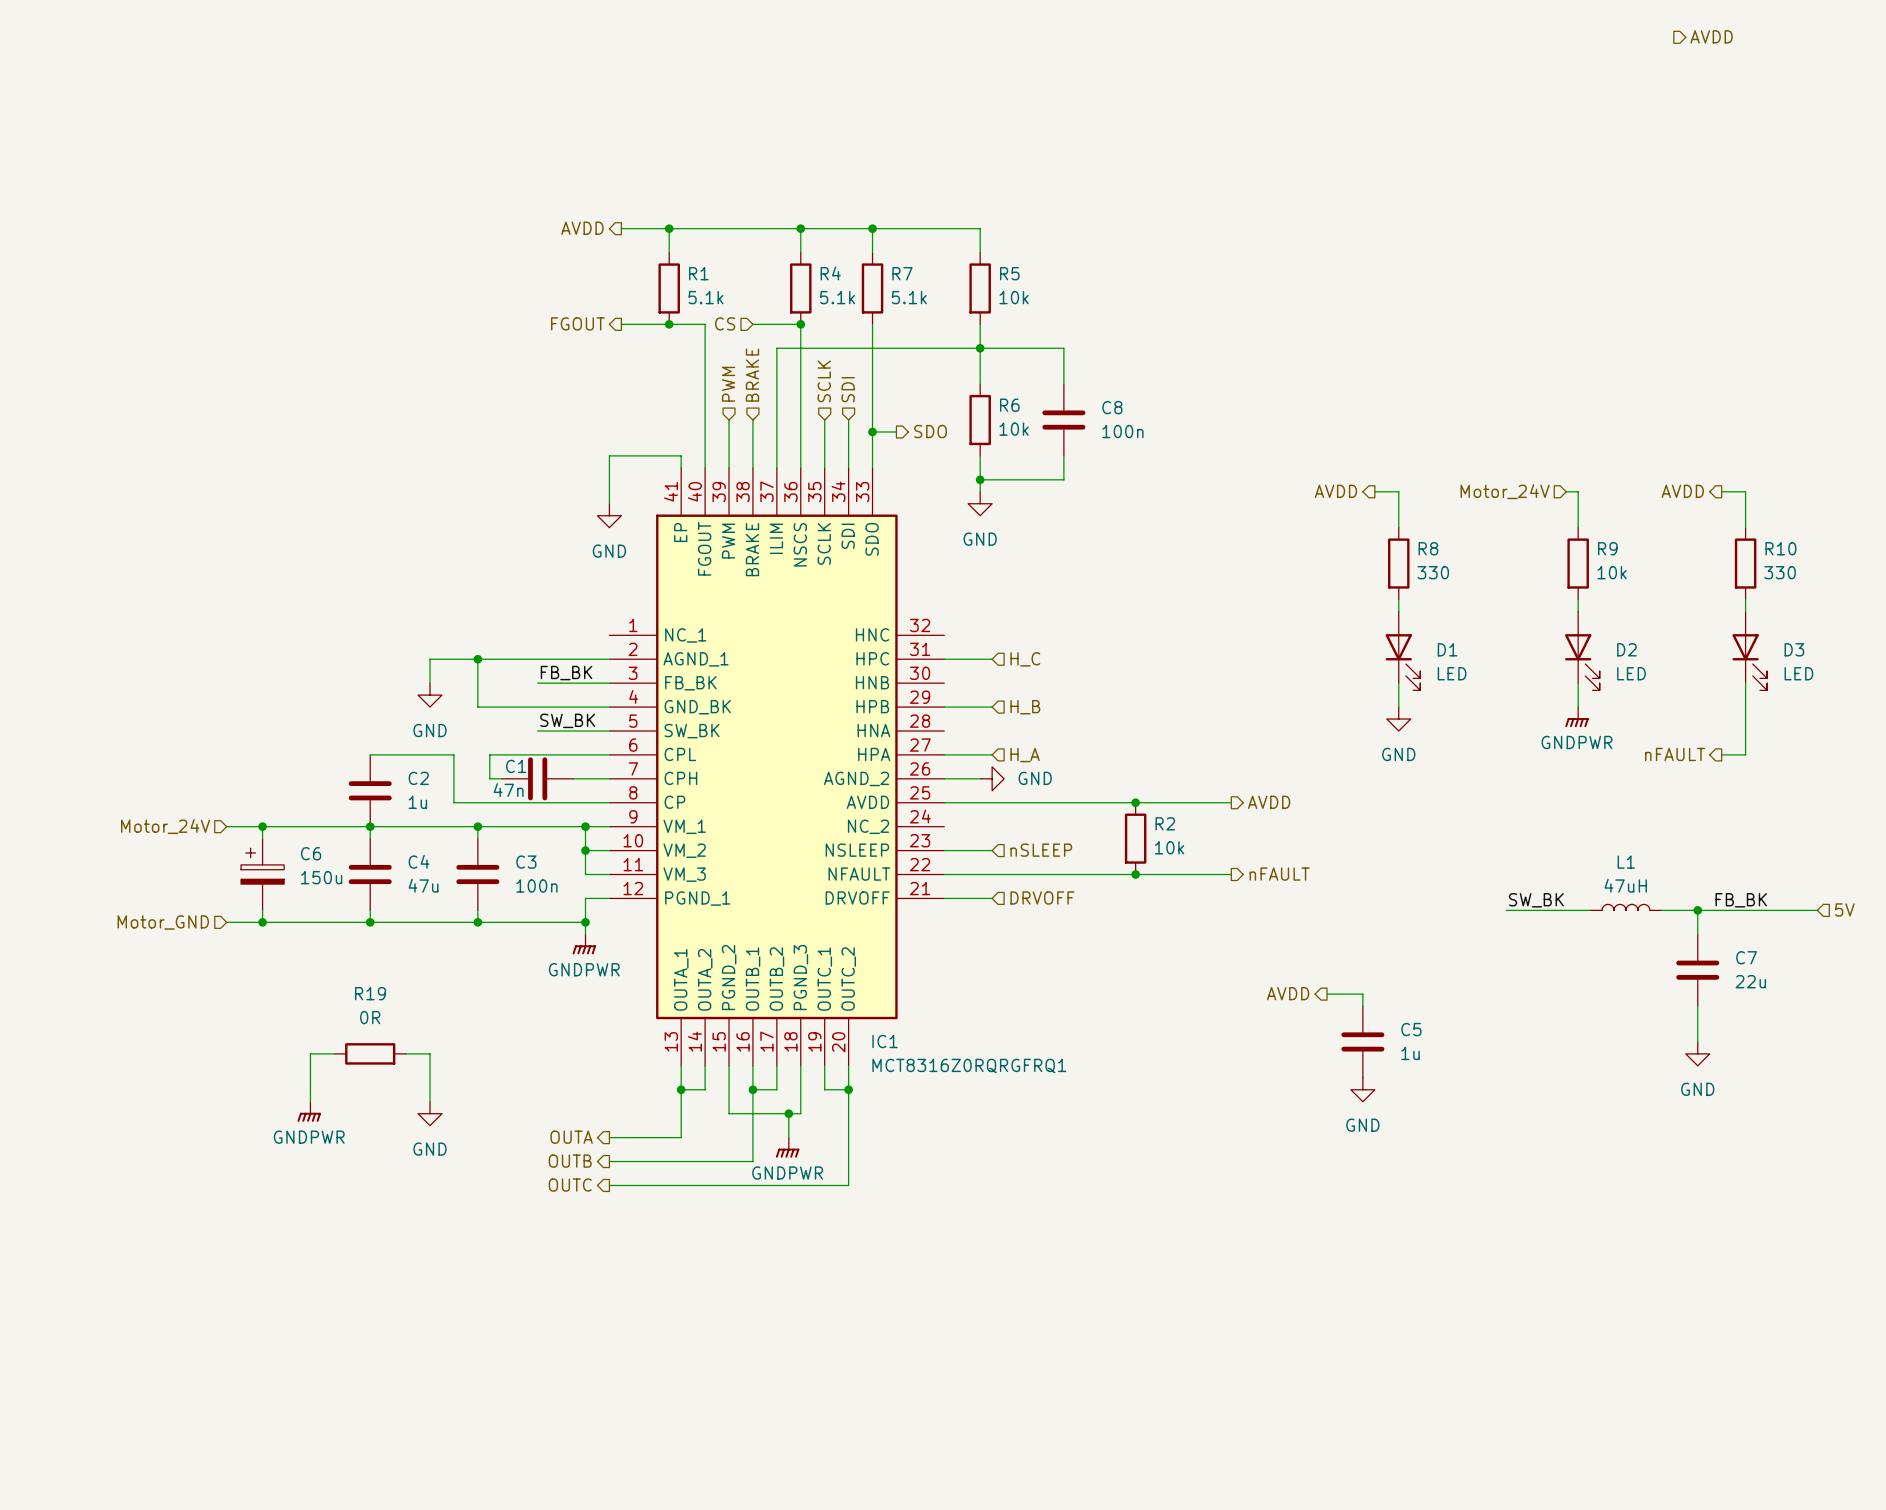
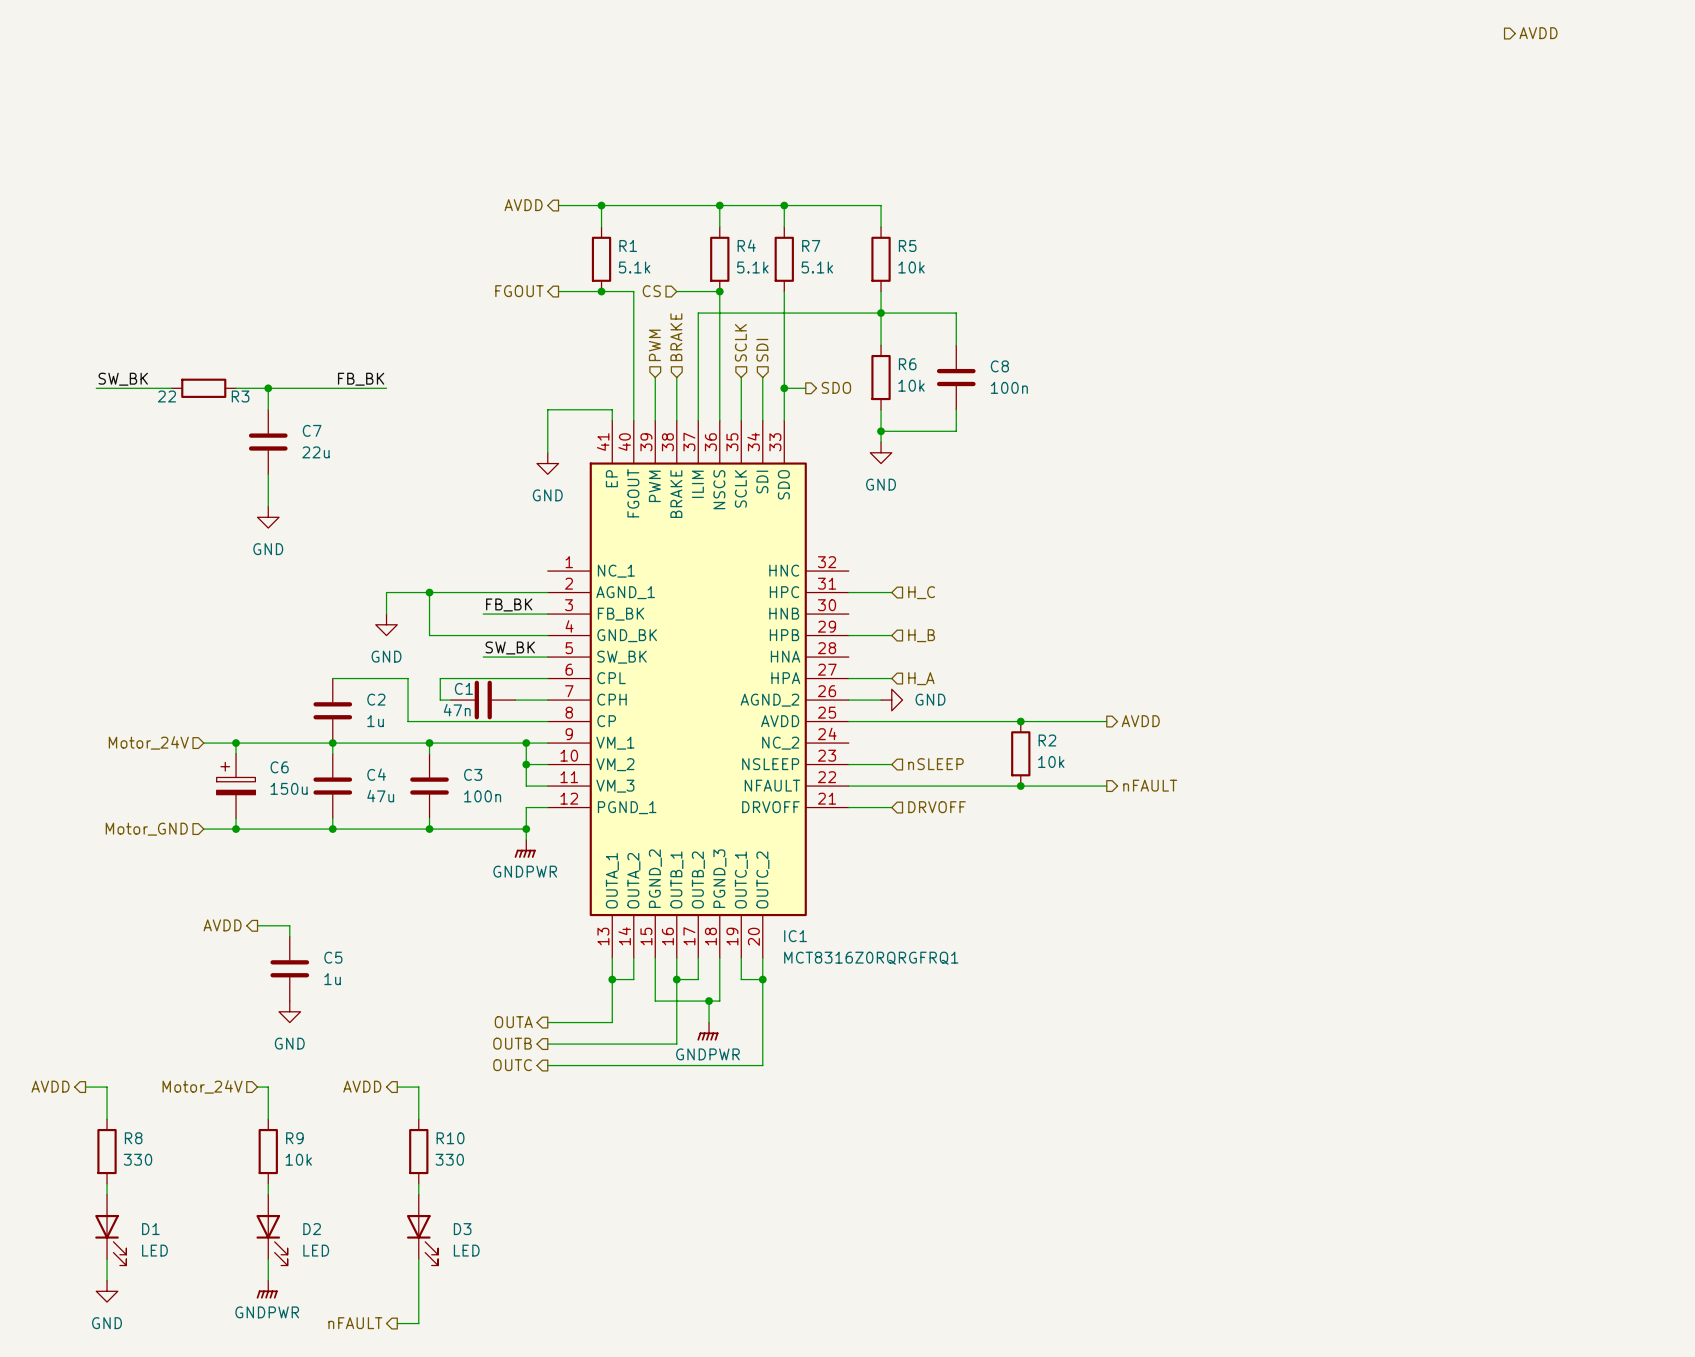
label: none -> SW_BK (123, 379)
label: none -> FB_BK (361, 379)
wire: none -> (96, 388) (171, 388)
R3: none -> 22 (203, 388)
wire: none -> (236, 388) (386, 388)
wire: none -> (268, 388) (268, 409)
junction: none -> (268, 388)
hierarchical label: AVDD (1335, 491) -> none
wire: (1374, 491) (1398, 491) (1398, 527) -> none
hierarchical label: Motor_24V (1505, 491) -> none
wire: (1566, 491) (1578, 491) (1578, 527) -> none
hierarchical label: AVDD (1682, 491) -> none
wire: (1721, 491) (1745, 491) (1745, 527) -> none
wire: none -> (268, 474) (268, 506)
R8 position: (1398, 563) -> (107, 1151)
R9 position: (1578, 563) -> (268, 1151)
R10 position: (1745, 563) -> (418, 1151)
power symbol: none -> GND (268, 517)
wire: (1398, 599) (1398, 611) -> none
wire: (1578, 599) (1578, 611) -> none
wire: (1745, 599) (1745, 611) -> none
D1 position: (1402, 650) -> (110, 1230)
D2 position: (1582, 650) -> (272, 1230)
D3 position: (1749, 650) -> (422, 1230)
wire: (1398, 683) (1398, 707) -> none
wire: (1578, 683) (1578, 707) -> none
wire: (1745, 683) (1745, 754) (1721, 754) -> none
power symbol: GNDPWR (1576, 717) -> none
power symbol: GND (1398, 719) -> none
hierarchical label: nFAULT (1675, 754) -> none
label: SW_BK (1536, 900) -> none
label: FB_BK (1741, 900) -> none
L1: 47uH (1626, 907) -> none
hierarchical label: 5V (1844, 909) -> none
wire: (1506, 910) (1590, 910) -> none
wire: (1661, 910) (1817, 910) -> none
wire: (1697, 910) (1697, 934) -> none
junction: (1697, 910) -> none
C7 position: (1697, 970) -> (268, 442)
hierarchical label: AVDD (1288, 993) -> none
wire: (1327, 994) (1362, 994) (1362, 1006) -> none
wire: (1697, 1006) (1697, 1041) -> none
hierarchical label: none -> AVDD (222, 925)
wire: none -> (257, 925) (289, 925) (289, 936)
C5 position: (1362, 1041) -> (289, 968)
wire: (334, 1053) (310, 1053) (310, 1101) -> none
R19: 0R (370, 1053) -> none
wire: (406, 1053) (430, 1053) (430, 1101) -> none
power symbol: GND (1697, 1053) -> none
power symbol: GND (1362, 1089) -> none
power symbol: GNDPWR (309, 1111) -> none
power symbol position: GND (430, 1113) -> GND (289, 1011)
hierarchical label: none -> AVDD (50, 1086)
hierarchical label: none -> AVDD (362, 1086)
wire: none -> (85, 1087) (107, 1087) (107, 1119)
hierarchical label: none -> Motor_24V (202, 1086)
wire: none -> (257, 1087) (268, 1087) (268, 1119)
wire: none -> (397, 1087) (418, 1087) (418, 1119)
wire: none -> (107, 1183) (107, 1194)
wire: none -> (268, 1183) (268, 1194)
wire: none -> (418, 1183) (418, 1194)
wire: none -> (107, 1259) (107, 1280)
wire: none -> (268, 1259) (268, 1280)
wire: none -> (418, 1259) (418, 1323) (397, 1323)
power symbol: none -> GNDPWR (267, 1289)
power symbol: none -> GND (107, 1291)
hierarchical label: none -> nFAULT (355, 1323)

